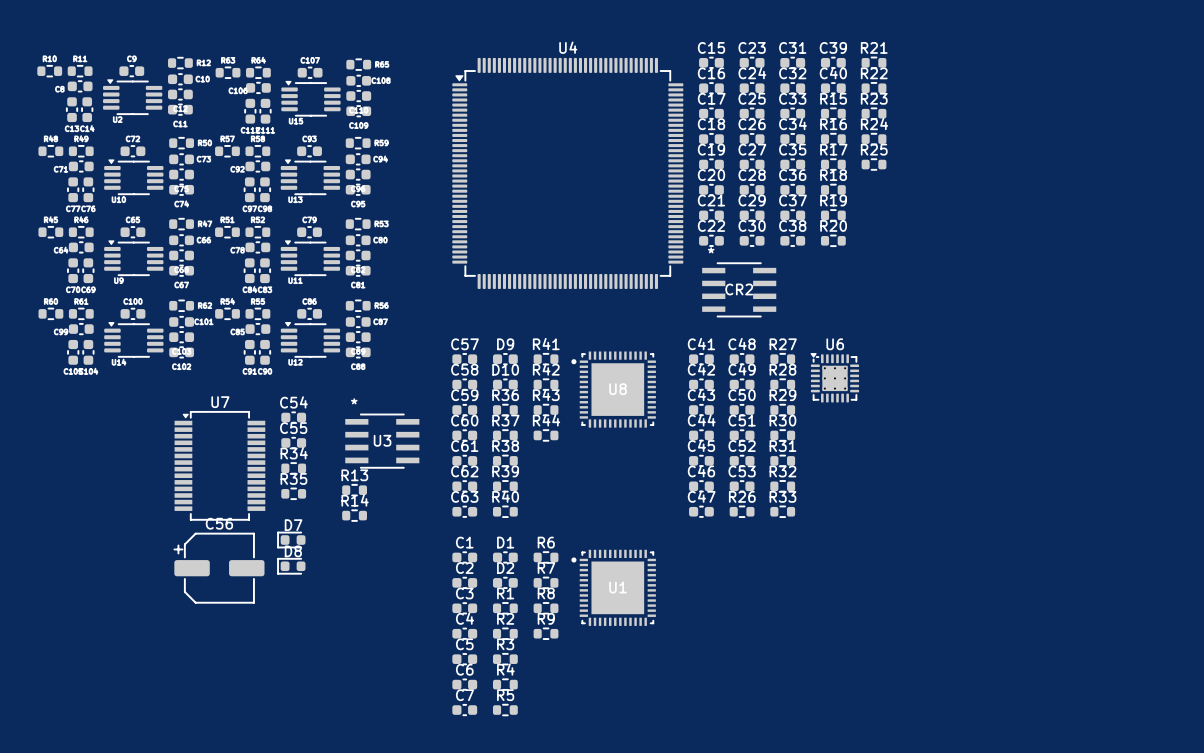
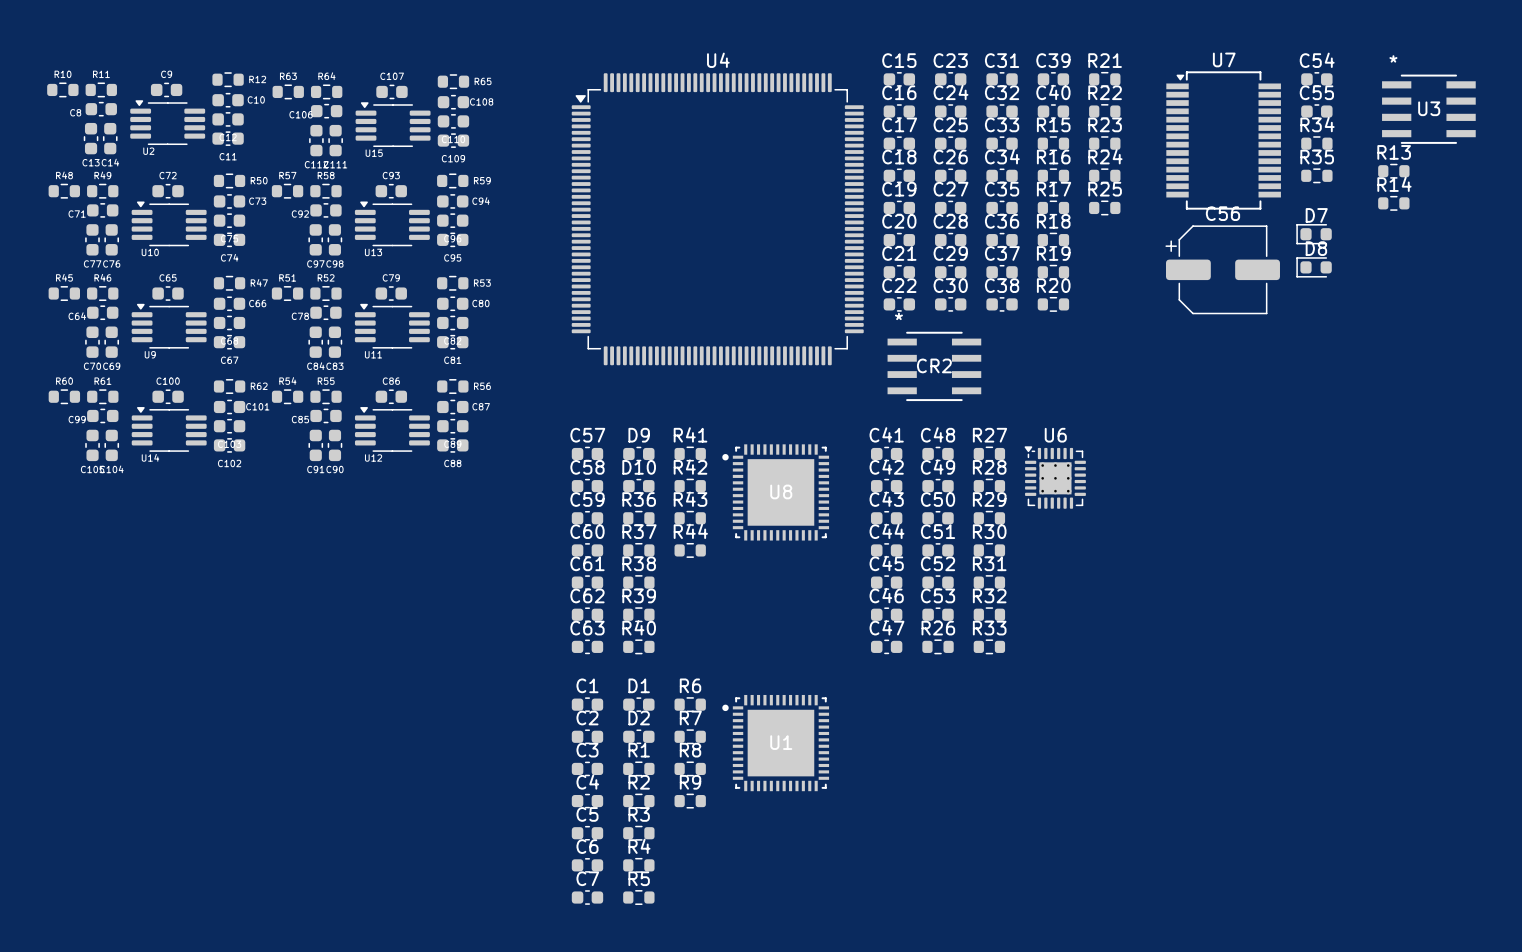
C54 position: (293, 417) -> (1316, 79)
U3 position: (382, 441) -> (1428, 109)
C55 position: (293, 442) -> (1316, 111)
U7 position: (219, 465) -> (1223, 140)
R34 position: (293, 468) -> (1316, 143)
R13 position: (354, 490) -> (1393, 171)
R35 position: (293, 493) -> (1316, 175)
R14 position: (354, 515) -> (1393, 203)
C56 footprint: [173, 533, 265, 604] -> [1165, 225, 1280, 315]
D7 position: (291, 540) -> (1314, 234)
D8 position: (291, 566) -> (1314, 267)

